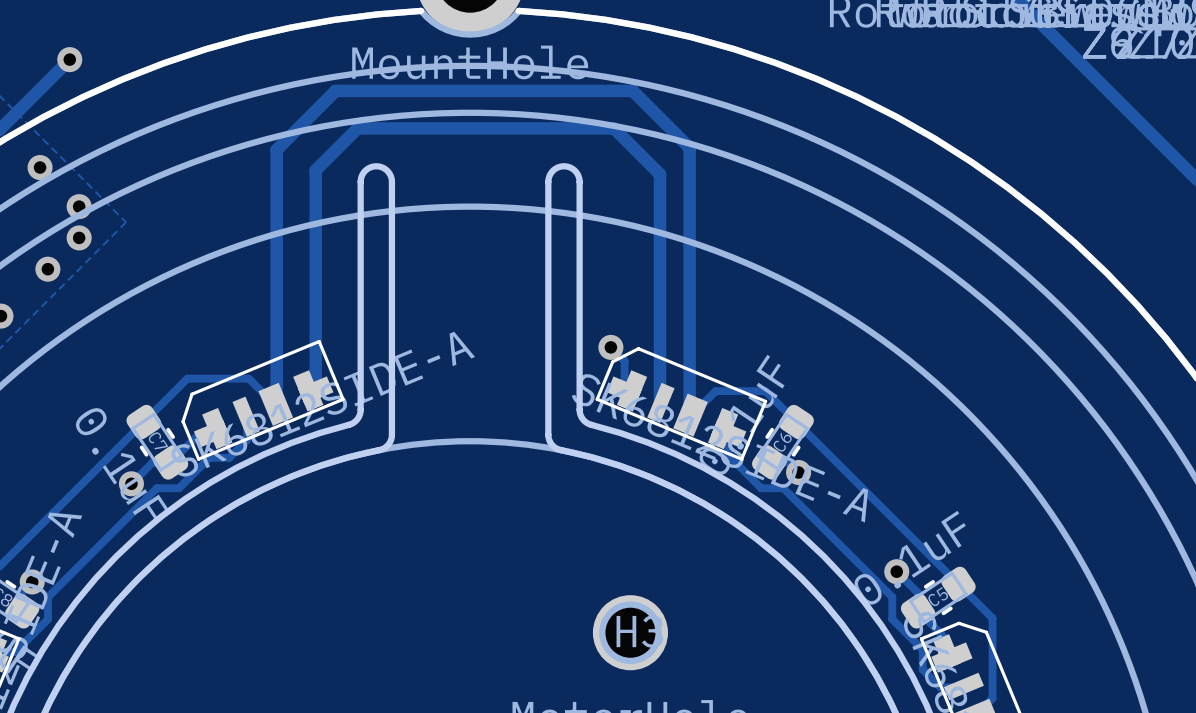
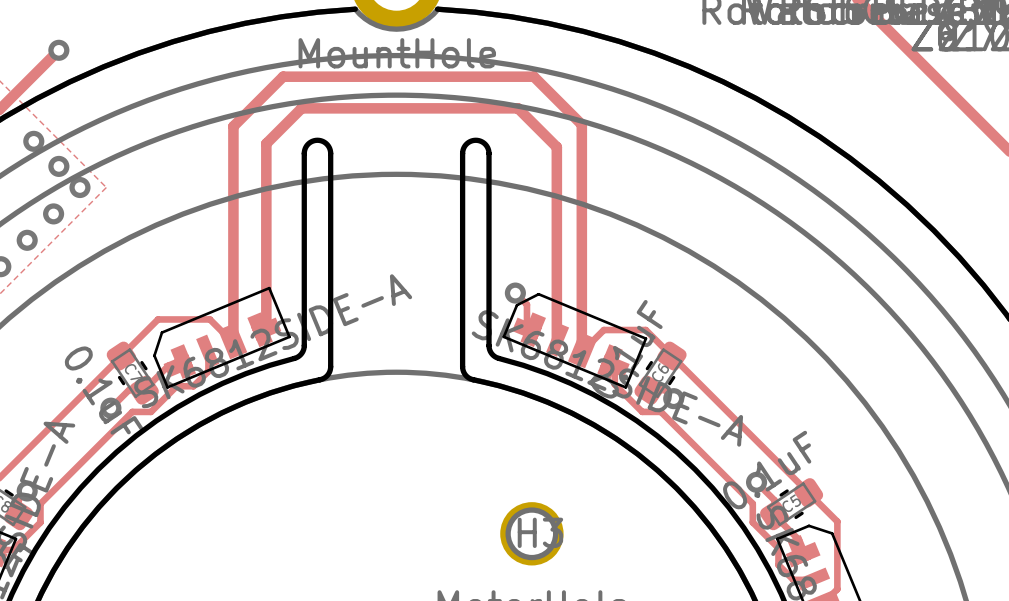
via: none -> (58, 166)
via: (79, 206) -> none
via: none -> (79, 187)
via: (79, 237) -> none
via: none -> (53, 213)
via: (47, 269) -> none
via: none -> (27, 240)

